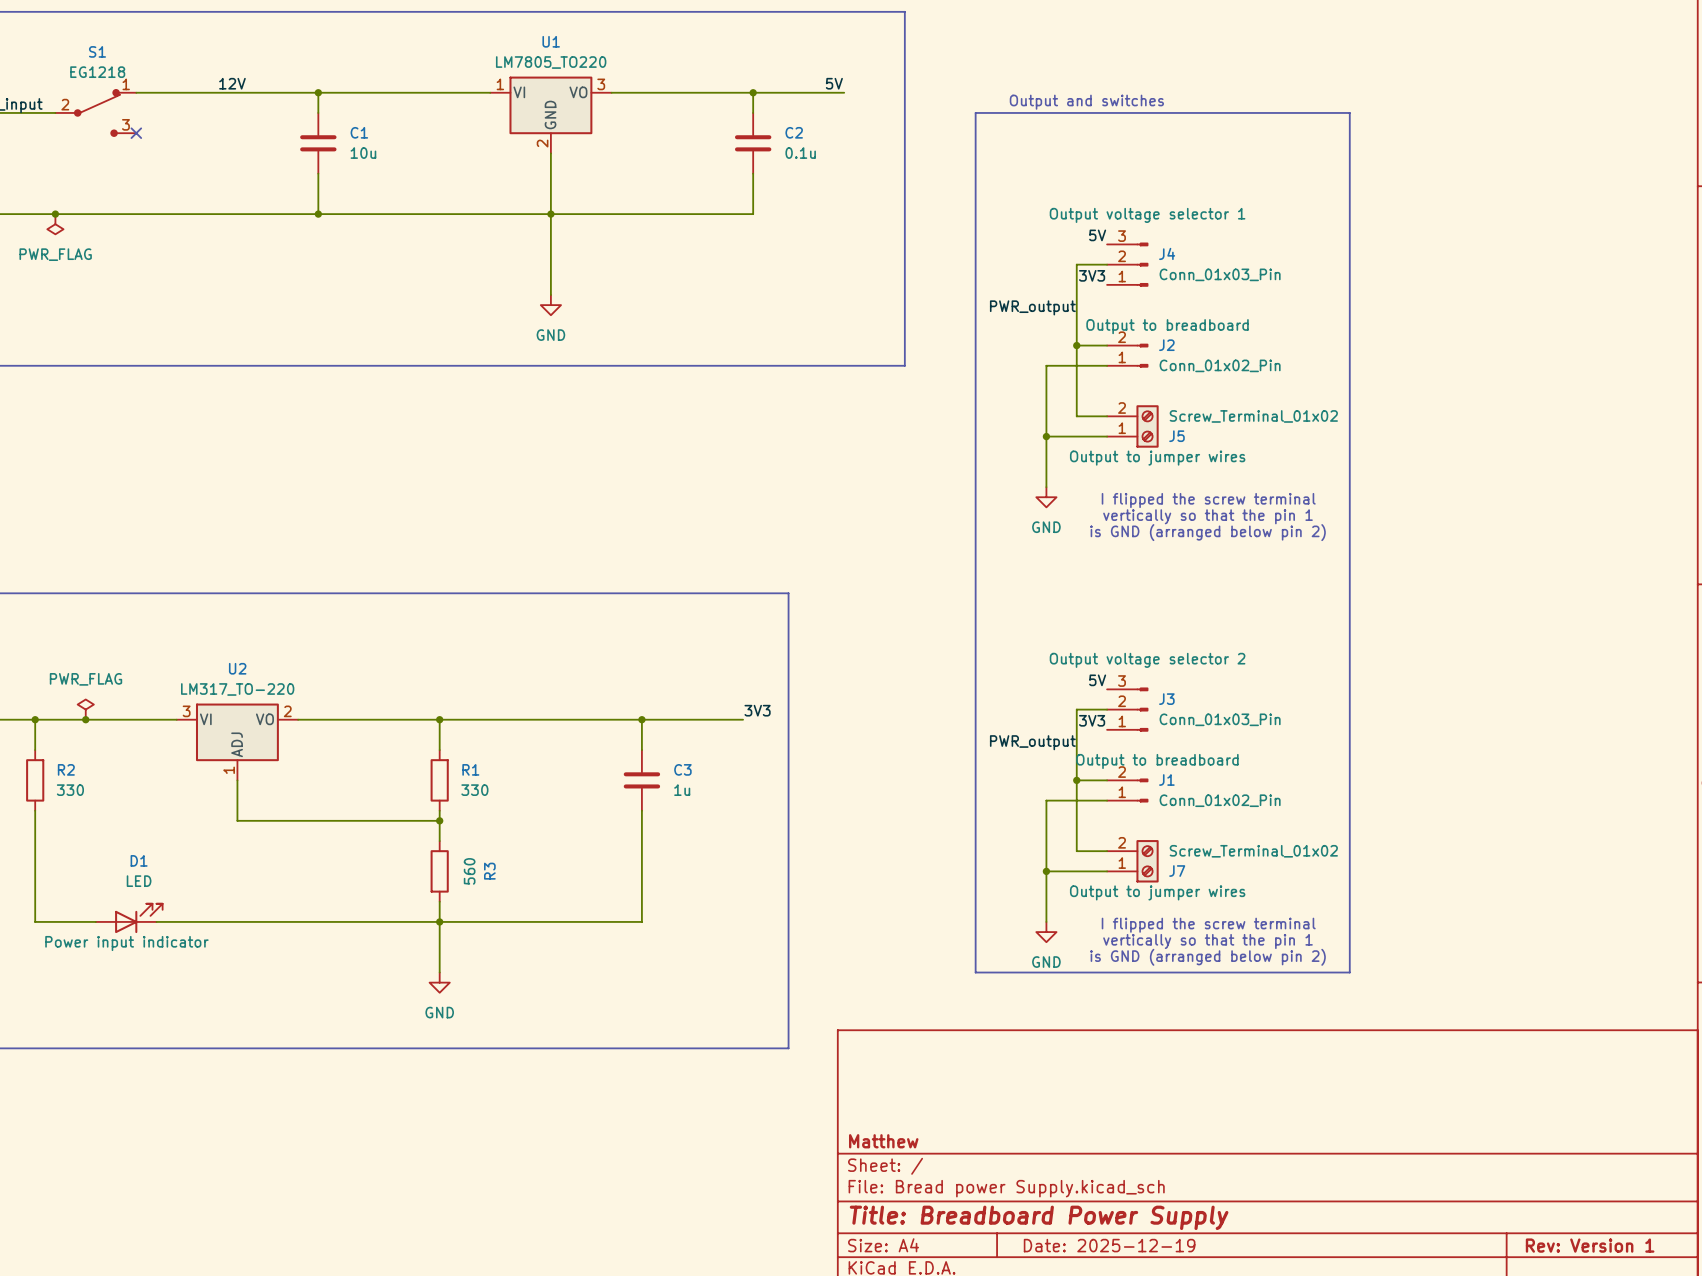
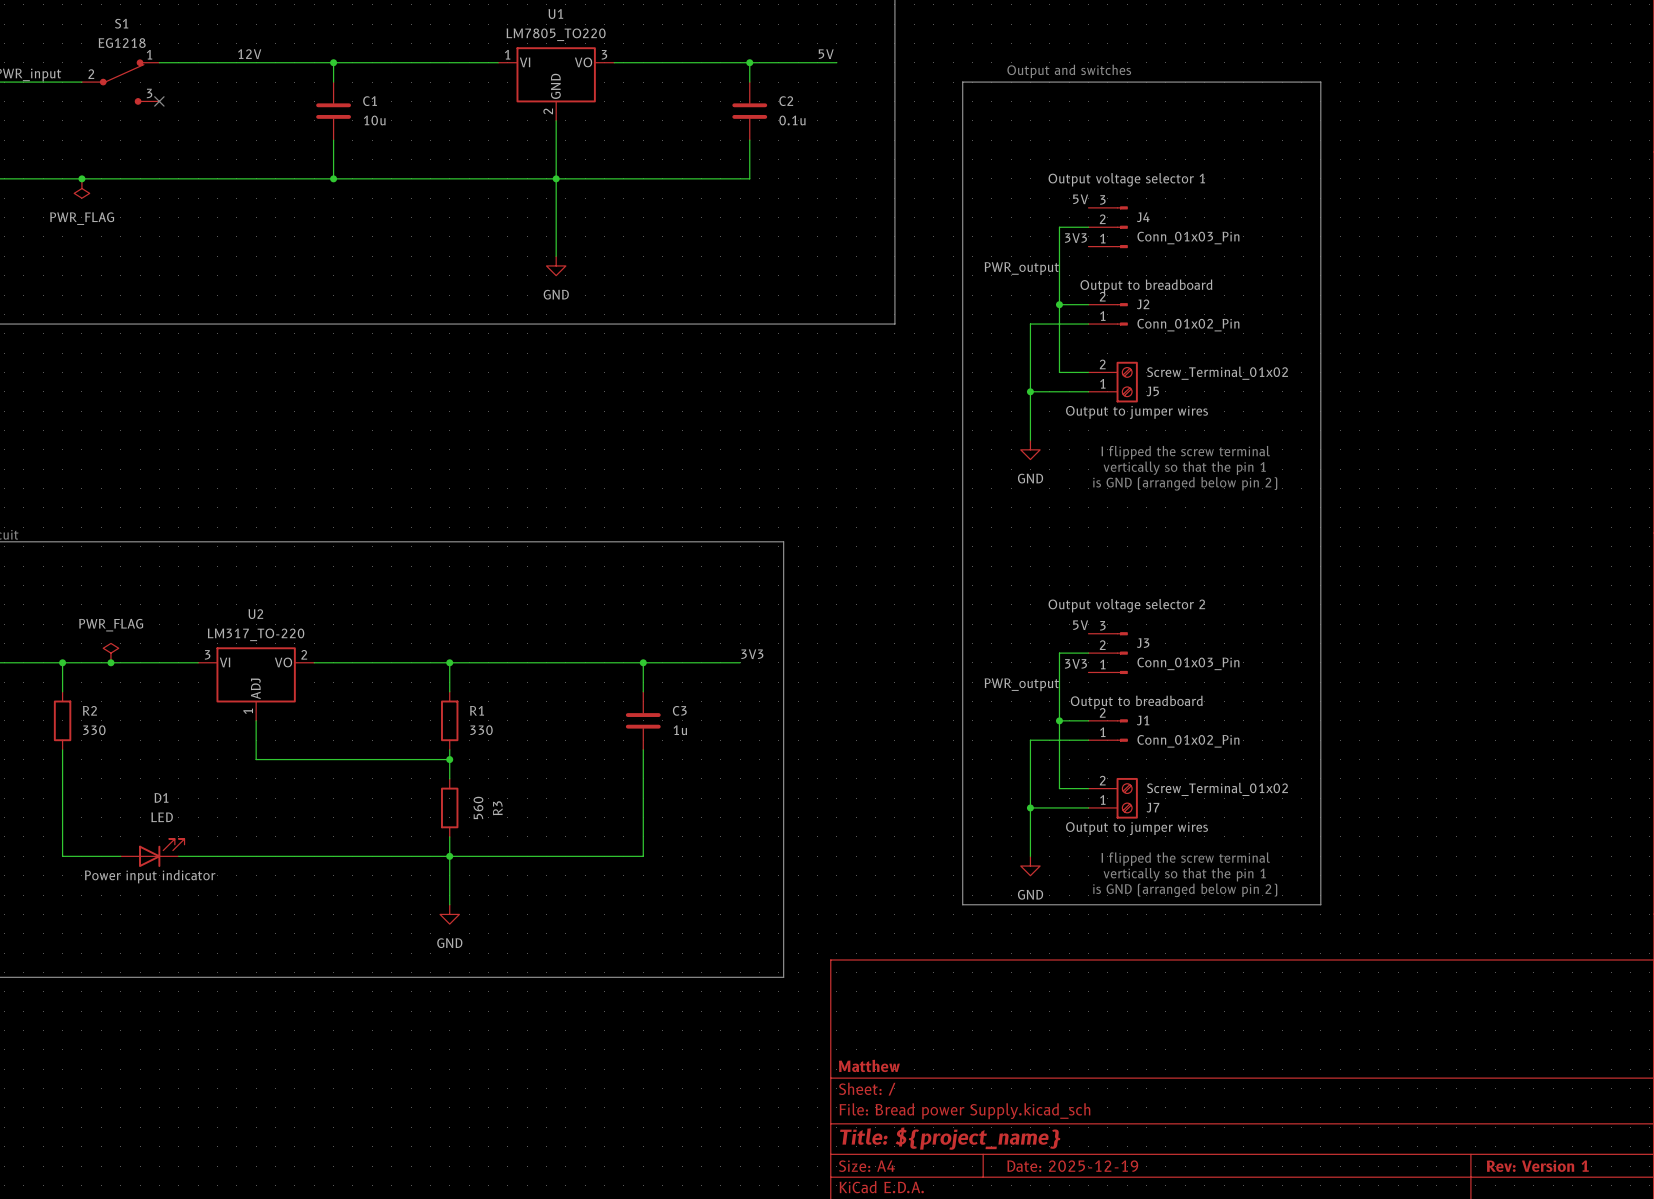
title block: Title: Breadboard Power Supply (1039, 1217) -> Title: ${project_name} (950, 1138)

